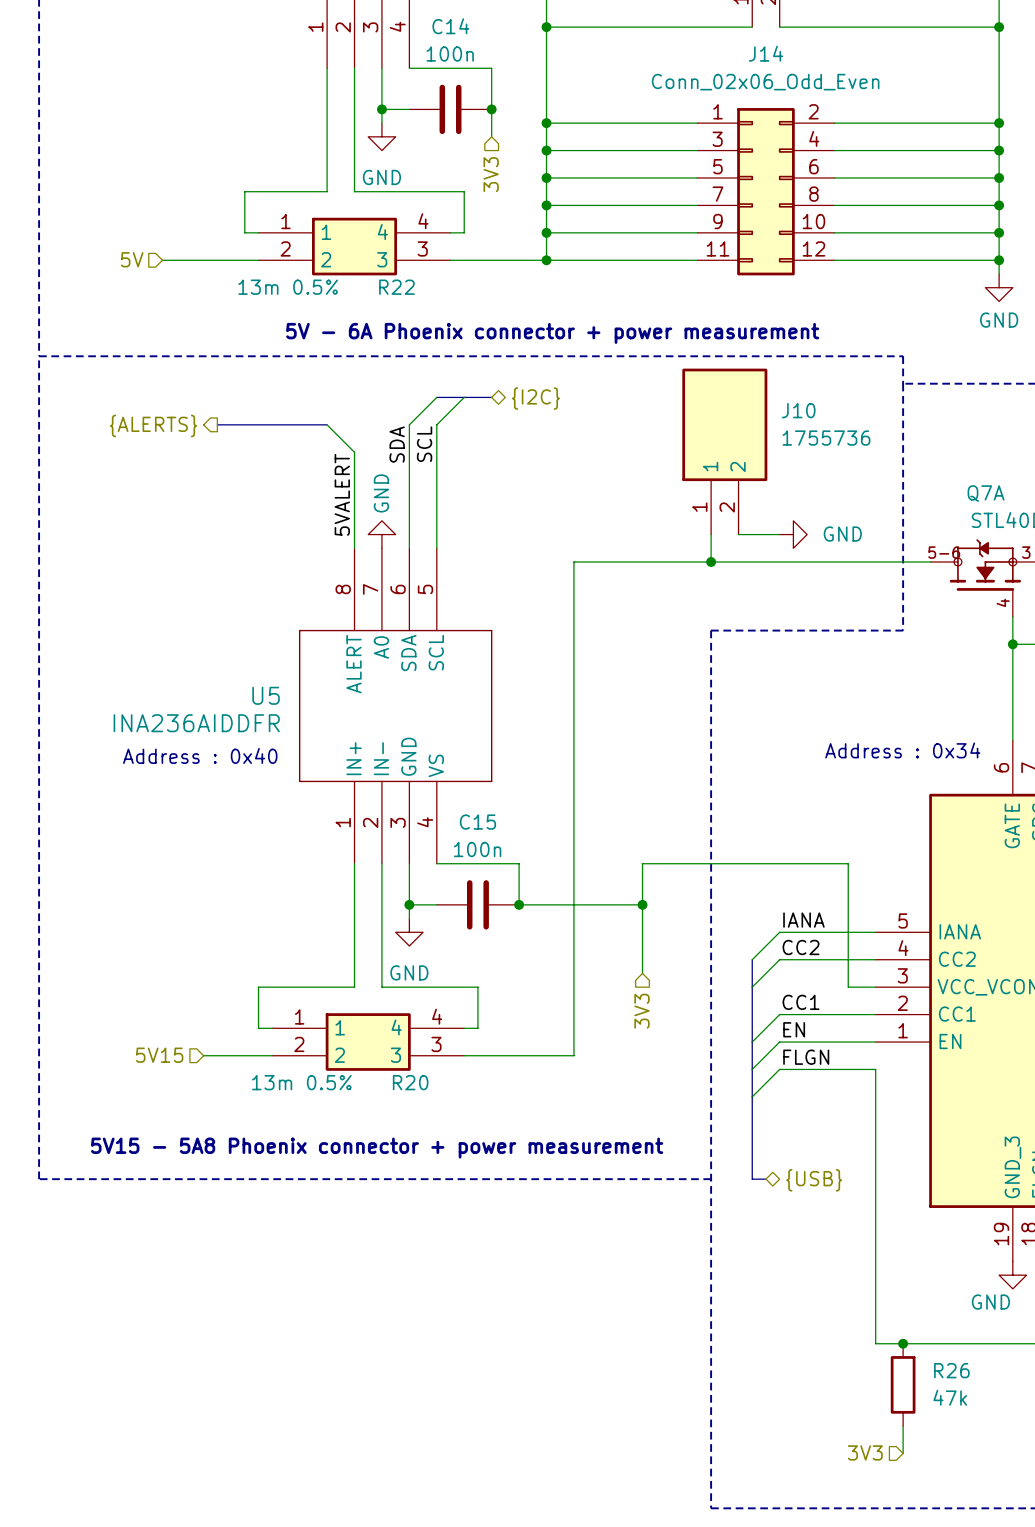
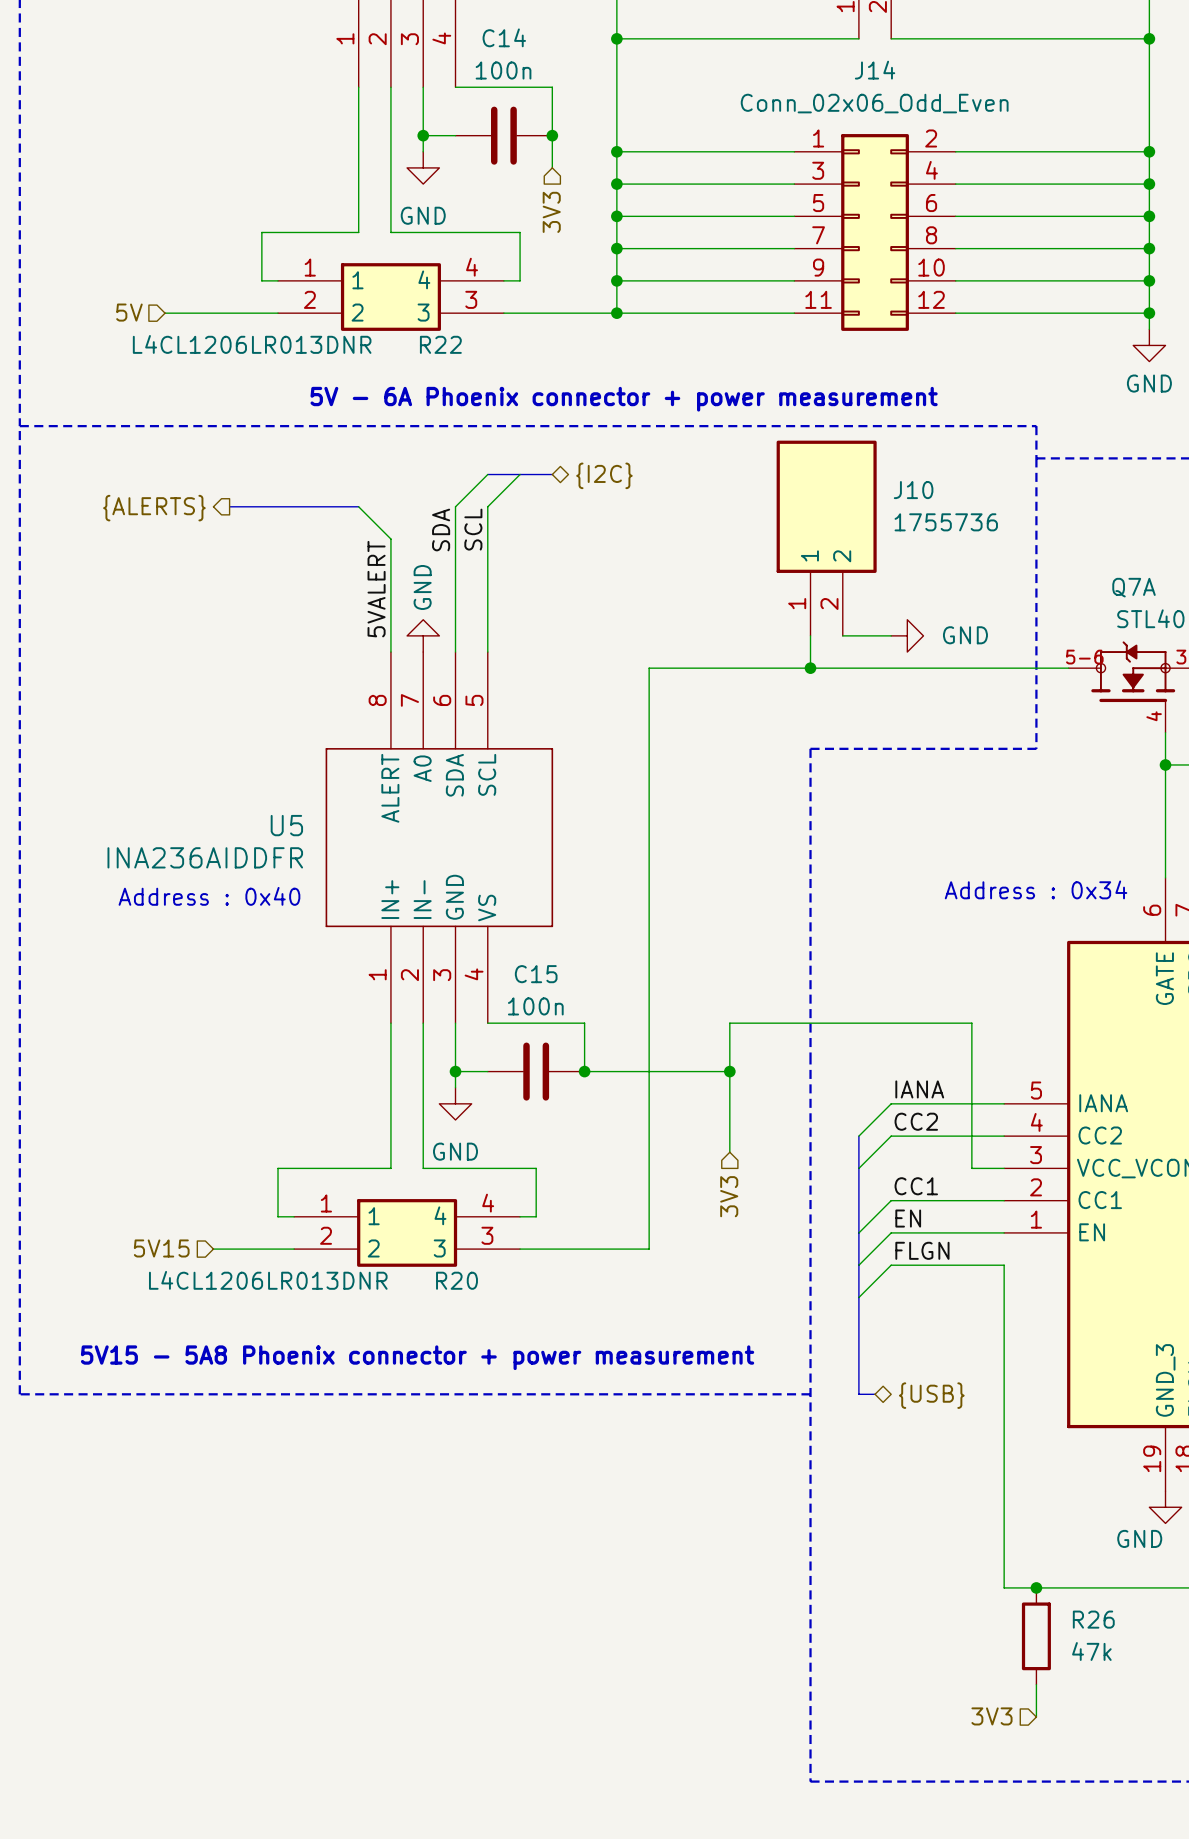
R22 value: 13m 0.5% (288, 287) -> L4CL1206LR013DNR (252, 344)
R20 value: 13m 0.5% (301, 1082) -> L4CL1206LR013DNR (268, 1280)

